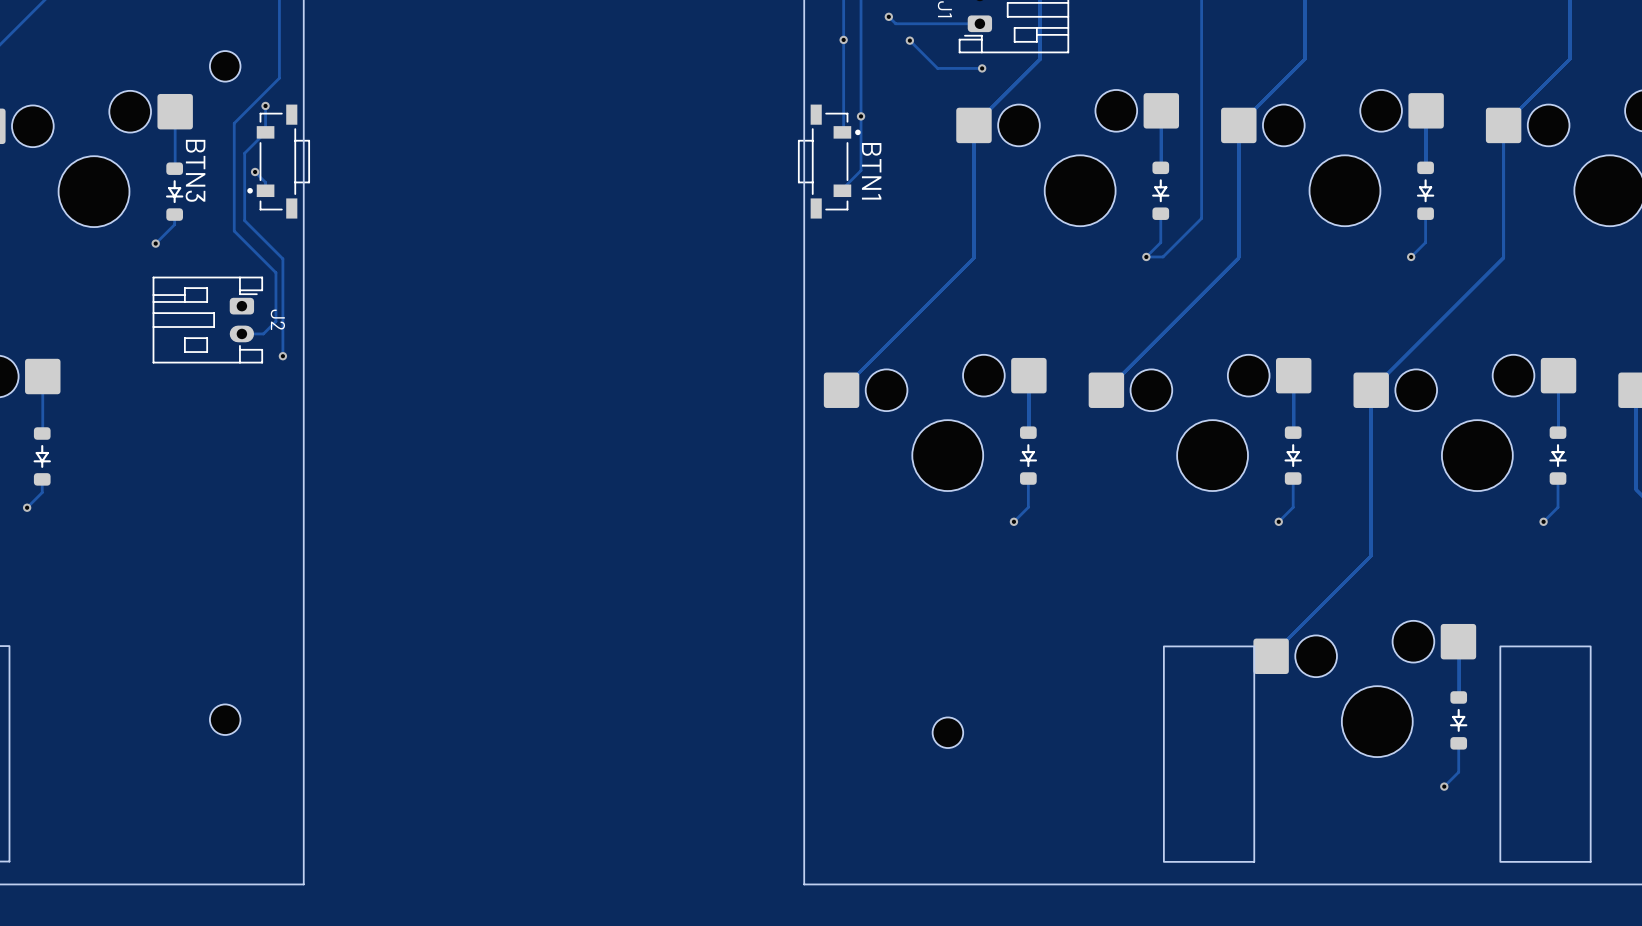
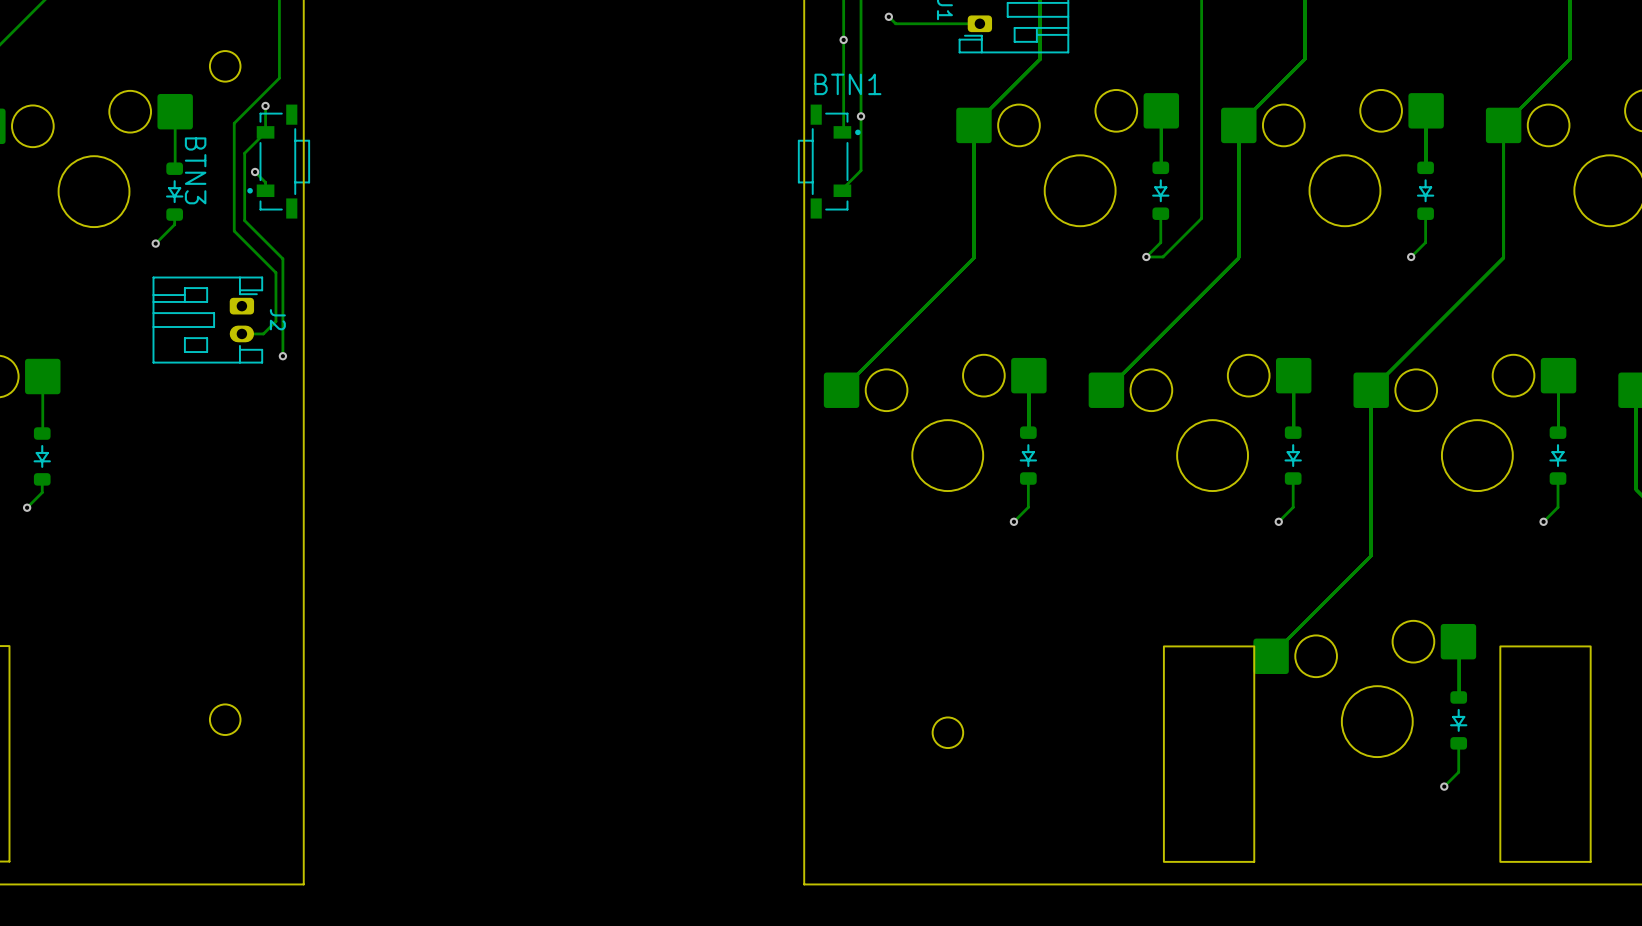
track: (909, 40) (937, 68) (982, 68) -> none
via: (909, 40) -> none
via: (982, 68) -> none
BTN1 name rotation: 0° (871, 171) -> 90° counterclockwise (847, 84)
BTN1 name position: BTN1 (871, 171) -> BTN1 (847, 84)

